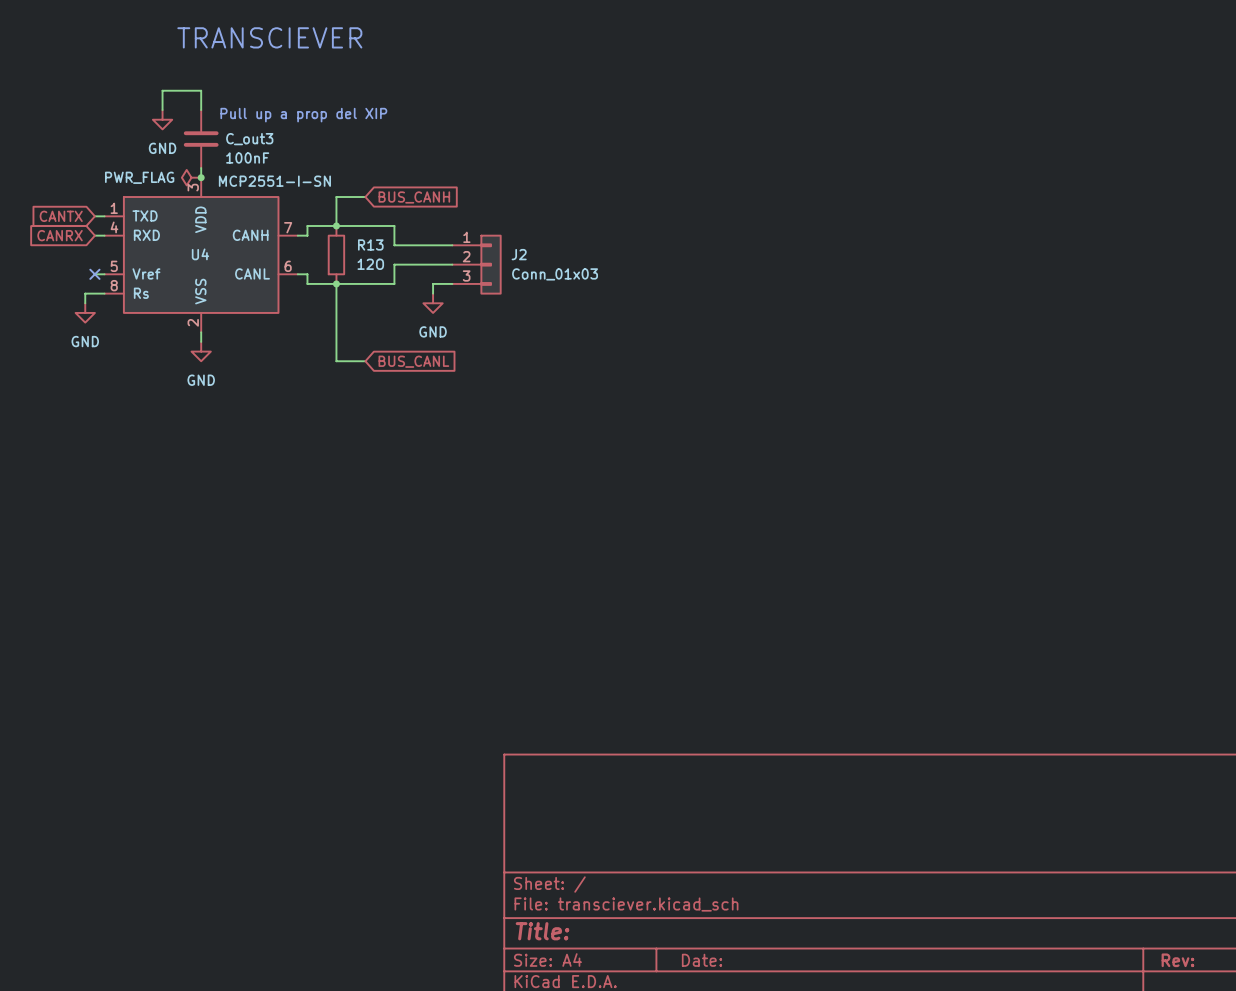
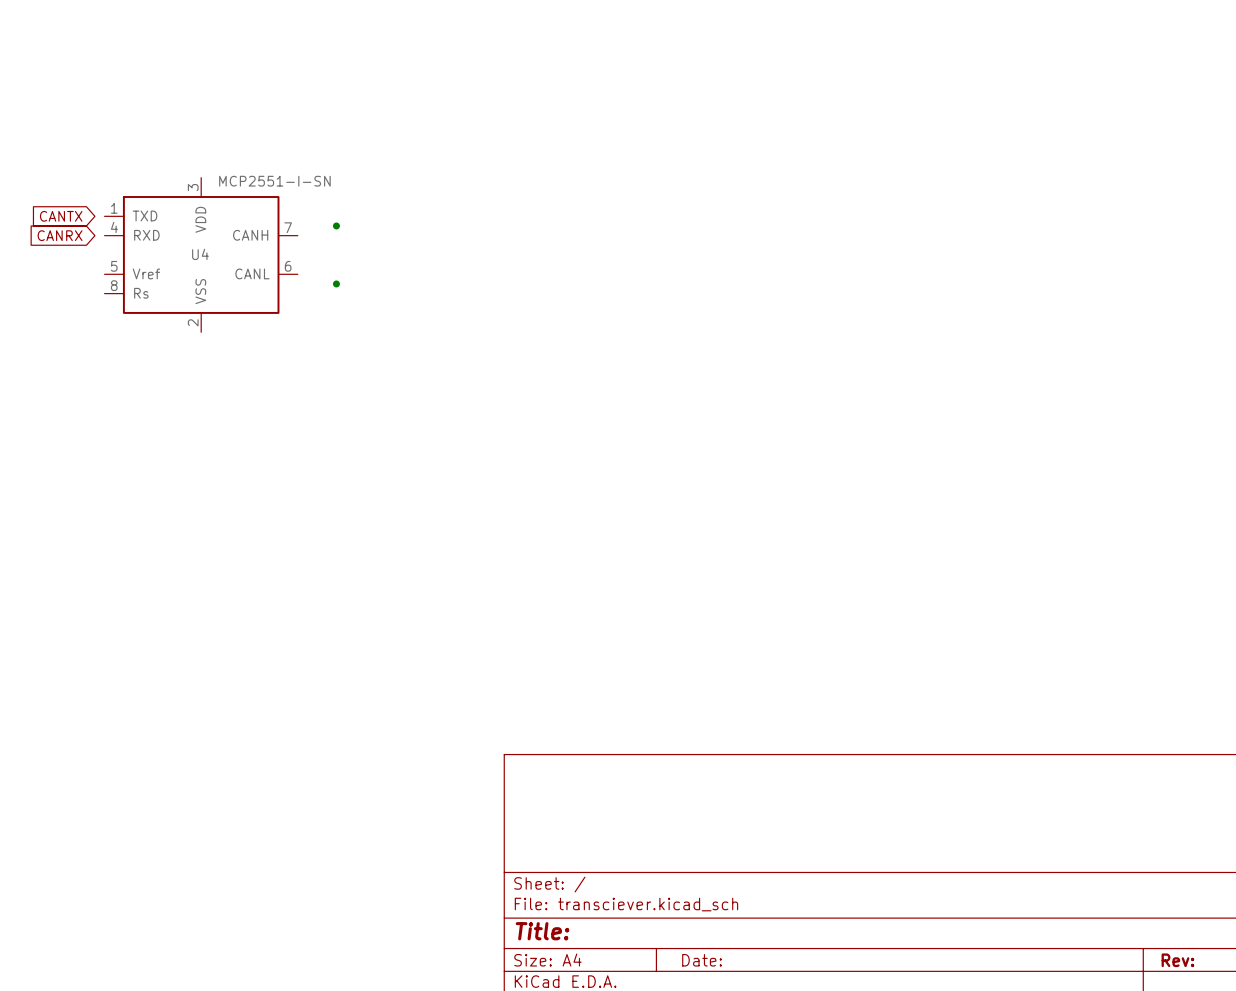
text: TRANSCIEVER (269, 37) -> none
wire: (162, 110) (162, 90) (201, 90) (201, 110) -> none
text: Pull up a prop del XIP (303, 115) -> none
power symbol: GND (162, 119) -> none
C_out3: 100nF (201, 139) -> none
wire: (201, 168) (201, 177) -> none
power symbol: PWR_FLAG (191, 177) -> none
junction: (201, 177) -> none
wire: (365, 197) (336, 197) (336, 225) -> none
global label: BUS_CANH (414, 197) -> none
wire: (94, 216) (104, 216) -> none
wire: (94, 235) (104, 235) -> none
wire: (297, 235) (307, 235) (307, 225) (394, 225) (394, 245) (452, 245) -> none
R13: 12O (336, 254) -> none
wire: (452, 264) (394, 264) (394, 283) (307, 283) (307, 274) (297, 274) -> none
J2: Conn_01x03 (477, 264) -> none
wire: (94, 274) (104, 274) -> none
no-connect mark: (94, 274) -> none
wire: (336, 283) (336, 361) (365, 361) -> none
wire: (452, 283) (433, 283) (433, 293) -> none
wire: (104, 293) (85, 293) (85, 303) -> none
power symbol: GND (433, 303) -> none
power symbol: GND (85, 312) -> none
wire: (201, 332) (201, 341) -> none
power symbol: GND (201, 351) -> none
global label: BUS_CANL (413, 361) -> none

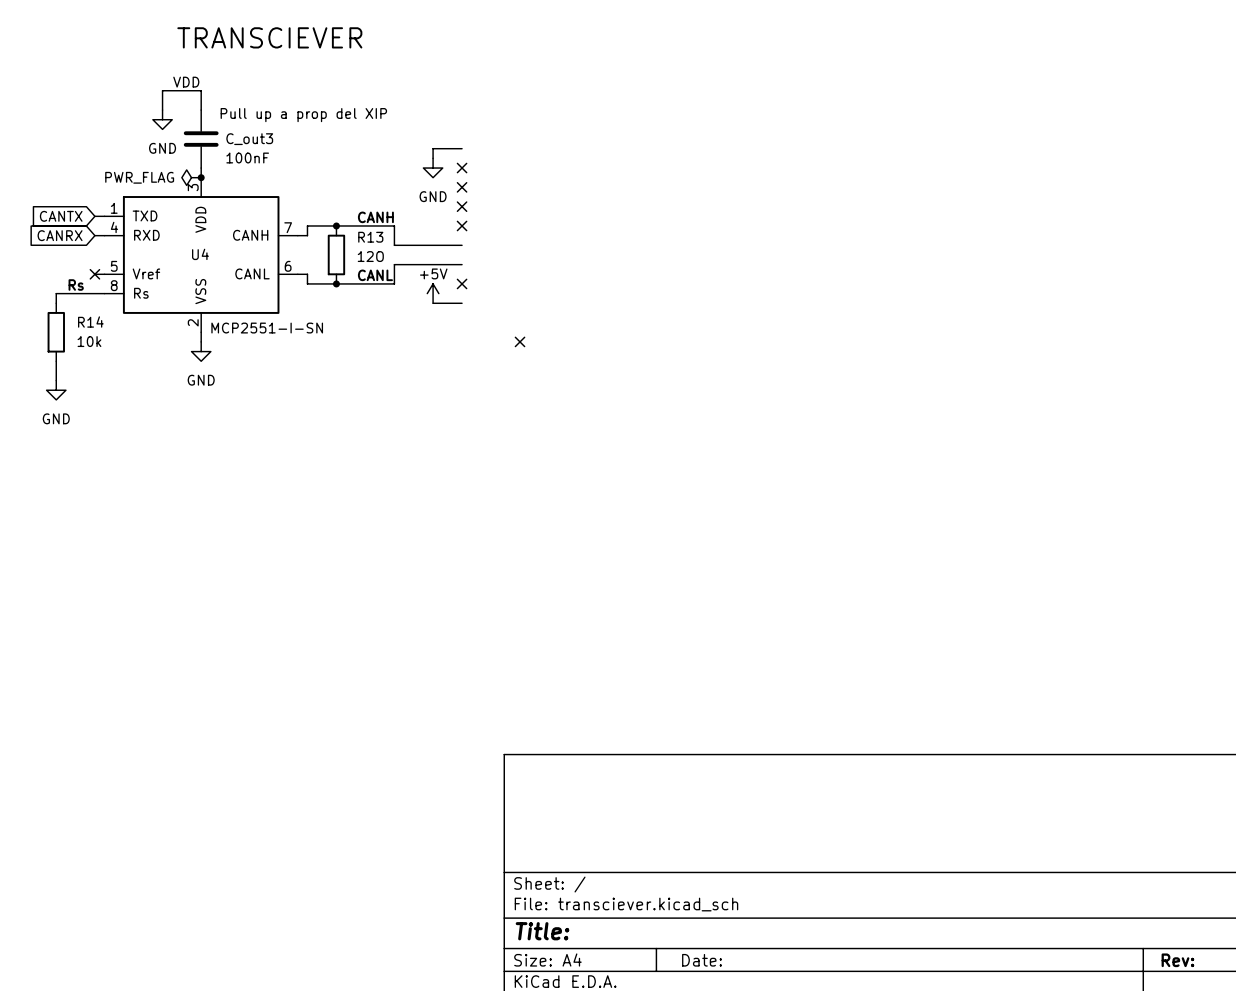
text: none -> TRANSCIEVER (269, 37)
label: none -> VDD (186, 82)
wire: none -> (162, 110) (162, 90) (201, 90) (201, 110)
text: none -> Pull up a prop del XIP (303, 115)
power symbol: none -> GND (162, 119)
C_out3: none -> 100nF (201, 139)
wire: none -> (462, 148) (433, 148) (433, 158)
wire: none -> (201, 168) (201, 177)
power symbol: none -> GND (433, 168)
no-connect mark: none -> (462, 168)
power symbol: none -> PWR_FLAG (191, 177)
junction: none -> (201, 177)
U4 value position: MCP2551-I-SN (274, 181) -> MCP2551-I-SN (267, 328)
no-connect mark: none -> (462, 187)
no-connect mark: none -> (462, 206)
wire: none -> (94, 216) (104, 216)
label: none -> CANH (375, 217)
no-connect mark: none -> (462, 225)
wire: none -> (94, 235) (104, 235)
wire: none -> (297, 235) (307, 235) (307, 225) (394, 225) (394, 245) (462, 245)
R13: none -> 12O (336, 254)
wire: none -> (462, 264) (394, 264) (394, 283) (307, 283) (307, 274) (297, 274)
wire: none -> (94, 274) (104, 274)
no-connect mark: none -> (94, 274)
label: none -> CANL (375, 275)
no-connect mark: none -> (462, 283)
label: none -> Rs (76, 285)
wire: none -> (104, 293) (56, 293) (56, 303)
power symbol: none -> +5V (433, 293)
wire: none -> (433, 303) (462, 303)
R14: none -> 10k (56, 332)
wire: none -> (201, 332) (201, 341)
no-connect mark: none -> (520, 341)
power symbol: none -> GND (201, 351)
wire: none -> (56, 361) (56, 380)
power symbol: none -> GND (56, 390)

